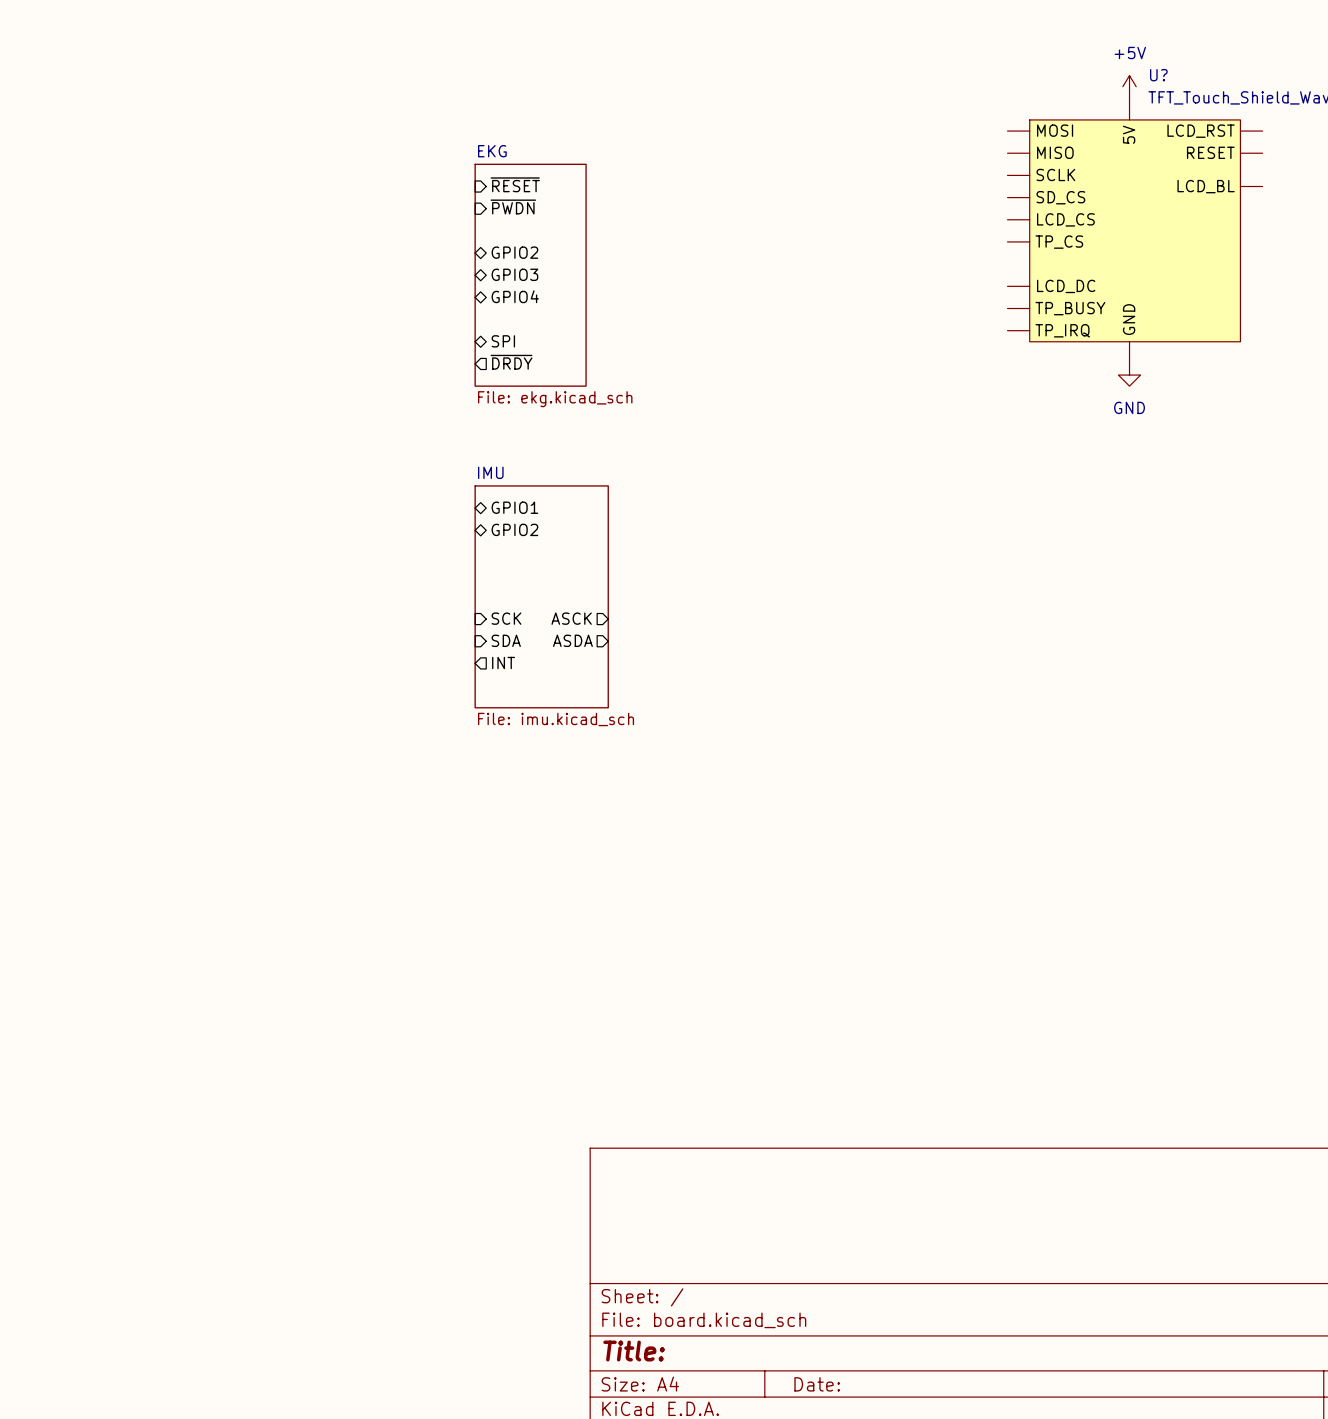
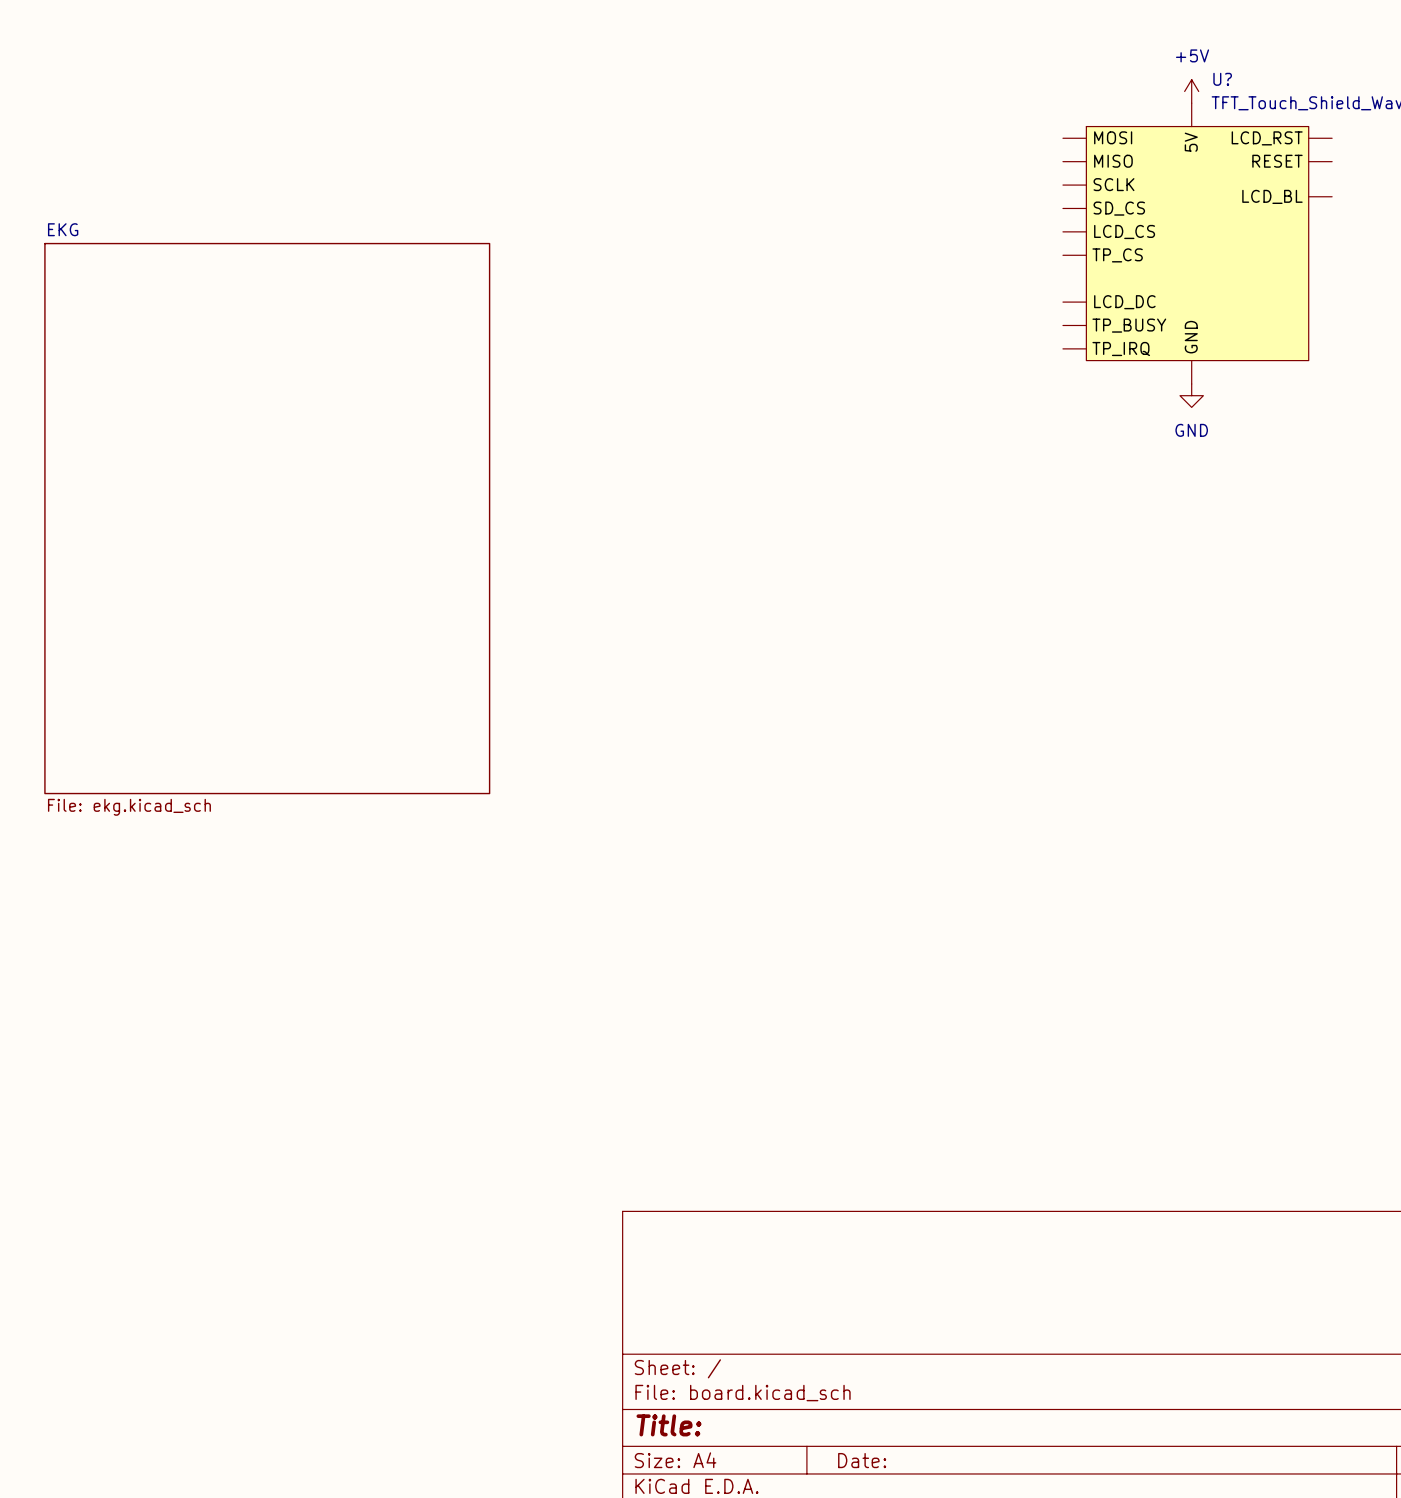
sheet pin: ~{RESET} (515, 184) -> none
sheet pin: ~{PWDN} (513, 206) -> none
sheet pin: GPIO2 (514, 252) -> none
sheet pin: GPIO3 (514, 274) -> none
sheet EKG: File: ekg.kicad_sch (530, 275) -> none
sheet pin: GPIO4 (515, 296) -> none
sheet pin: SPI (503, 341) -> none
sheet pin: ~{DRDY} (511, 362) -> none
sheet EKG: none -> File: ekg.kicad_sch (267, 518)
sheet pin: GPIO1 (514, 507) -> none
sheet pin: GPIO2 (514, 529) -> none
sheet IMU: File: imu.kicad_sch (541, 596) -> none
sheet pin: SCK (506, 618) -> none
sheet pin: ASCK (571, 618) -> none
sheet pin: SDA (506, 640) -> none
sheet pin: ASDA (572, 640) -> none
sheet pin: INT (503, 663) -> none

